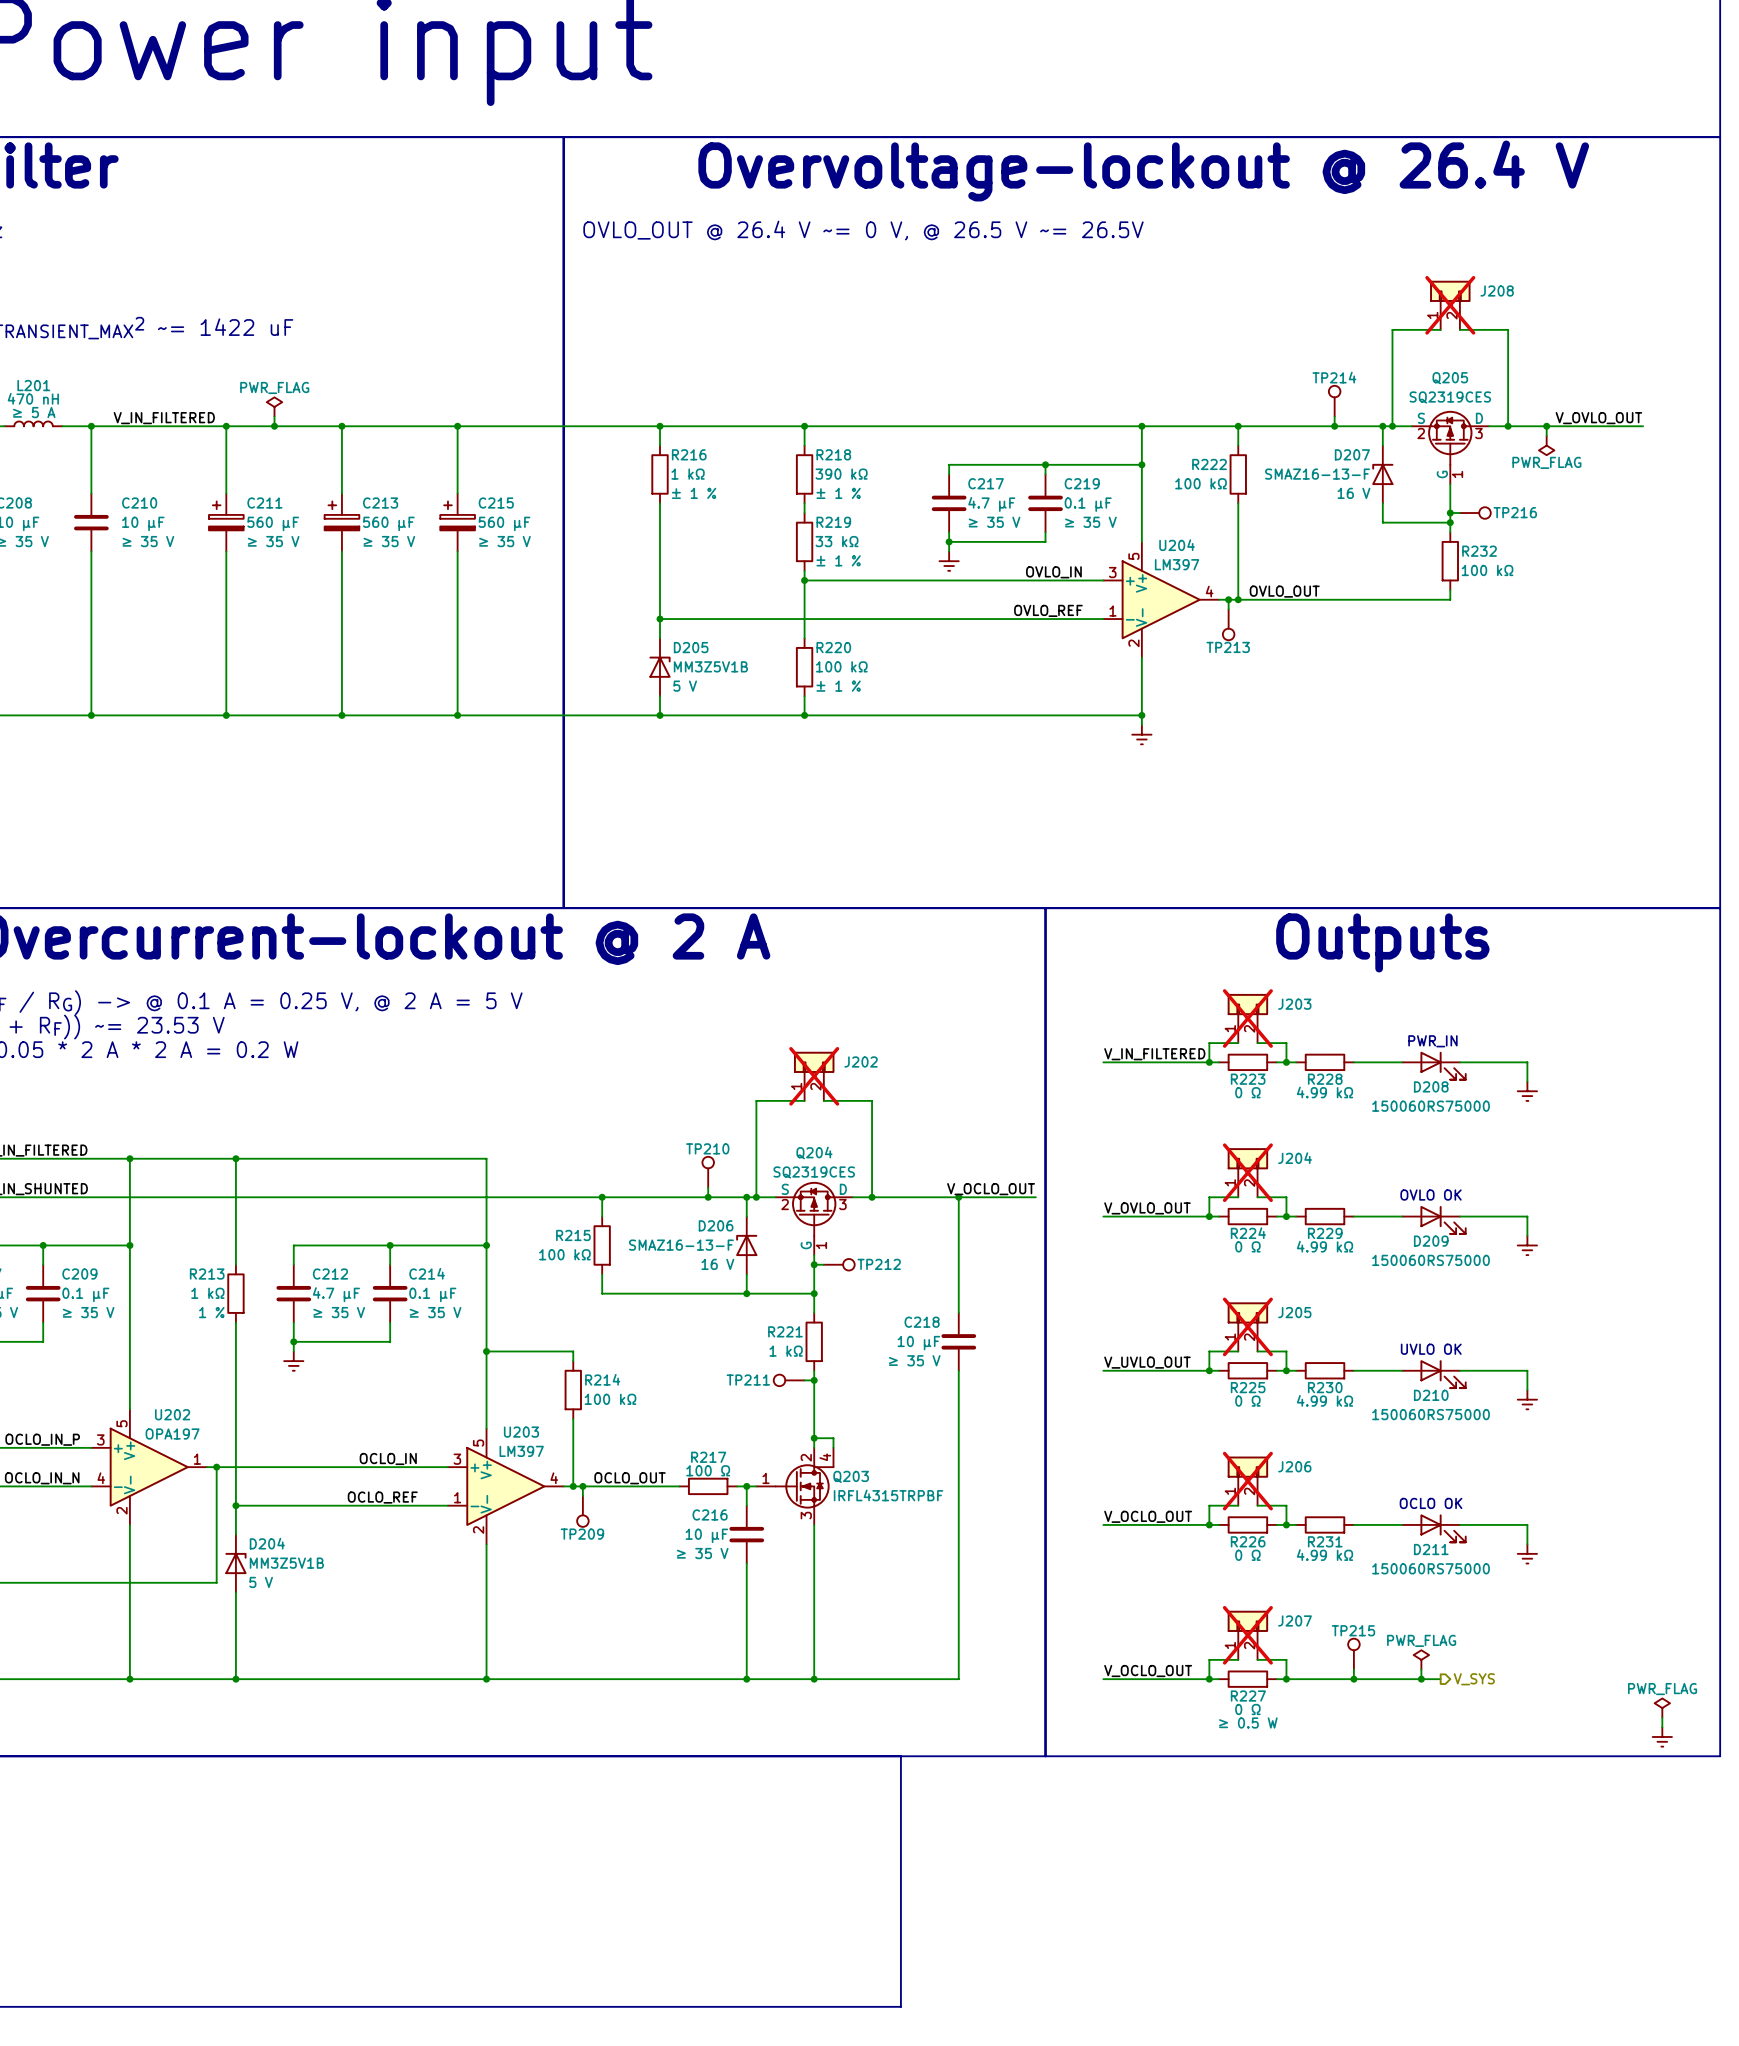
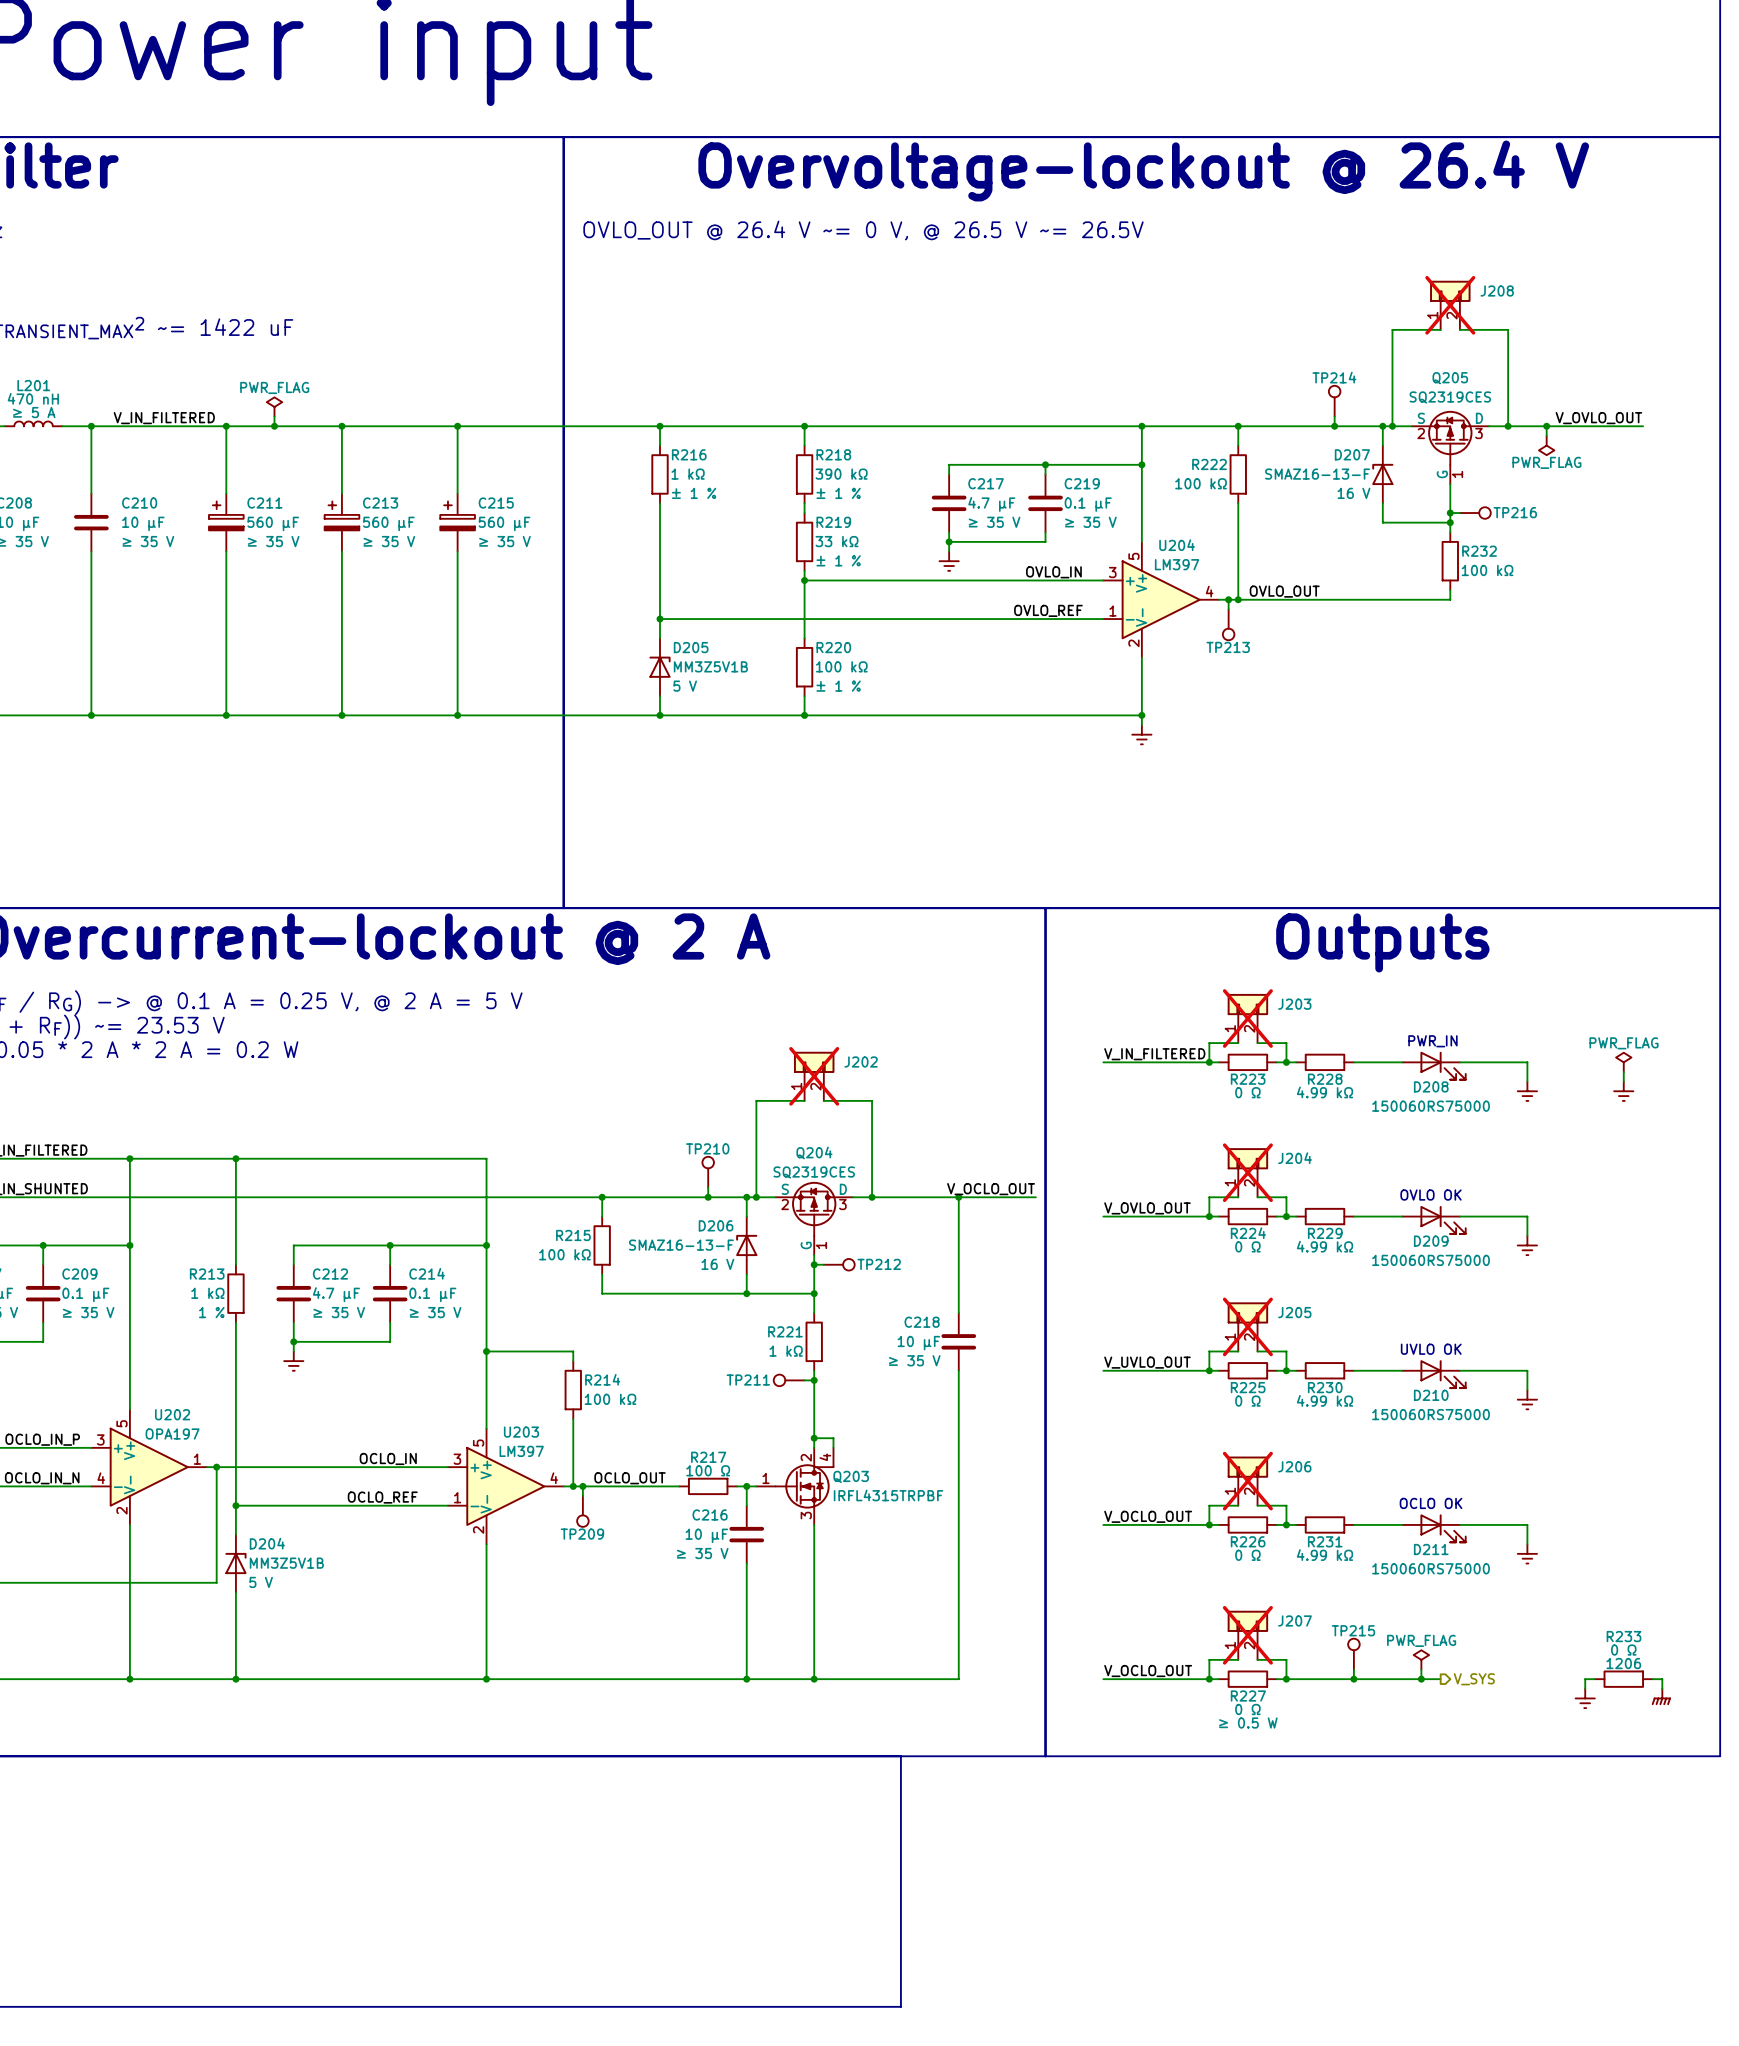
power symbol: none -> PWR_FLAG (1623, 1062)
wire: none -> (1623, 1071) (1623, 1081)
power symbol: none -> (1623, 1091)
wire: none -> (1594, 1679) (1585, 1679) (1585, 1688)
R233: none -> 0 Ω (1623, 1679)
wire: none -> (1652, 1679) (1662, 1679) (1662, 1688)
power symbol: none -> (1661, 1696)
power symbol: PWR_FLAG (1662, 1708) -> none
wire: (1662, 1717) (1662, 1727) -> none
power symbol position: (1662, 1736) -> (1585, 1698)

